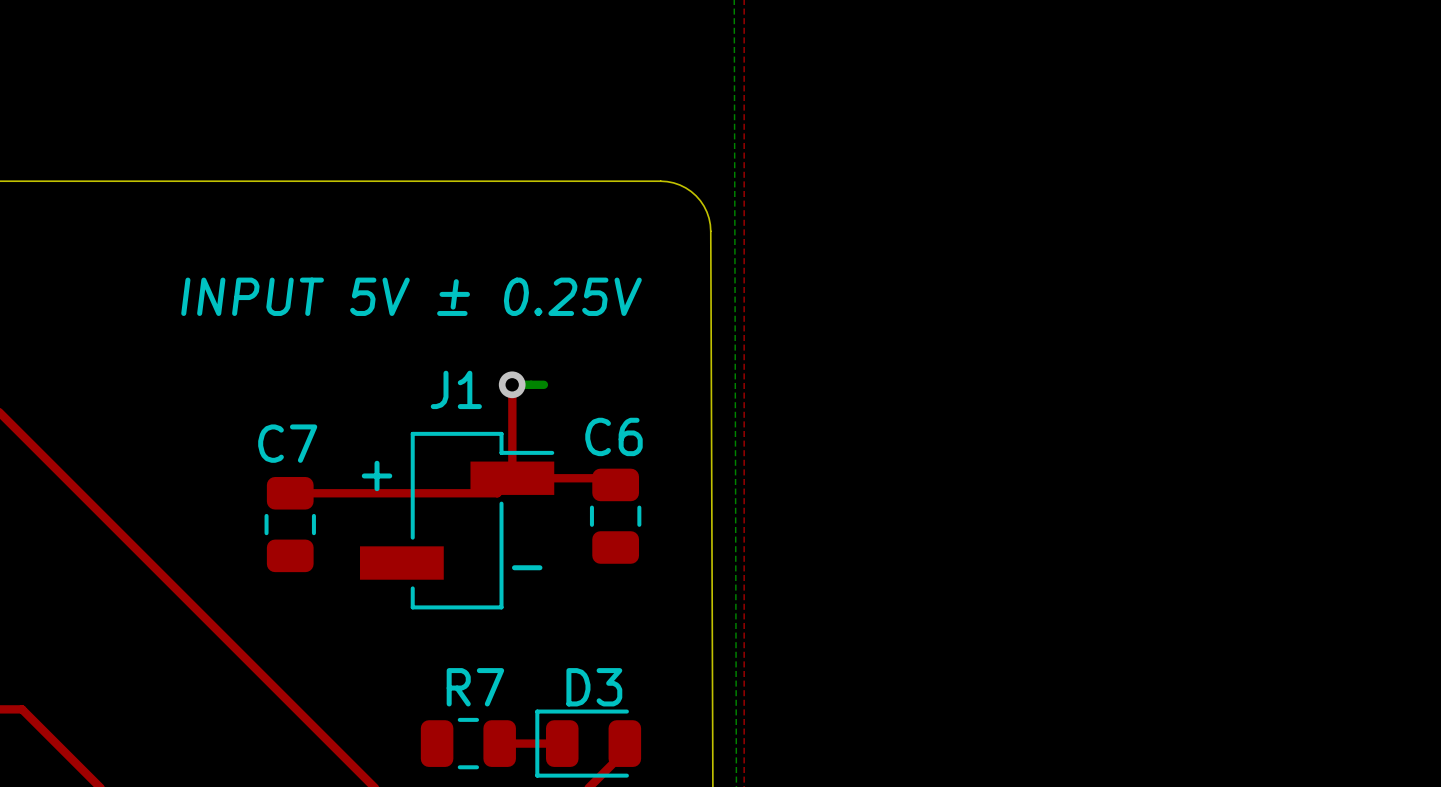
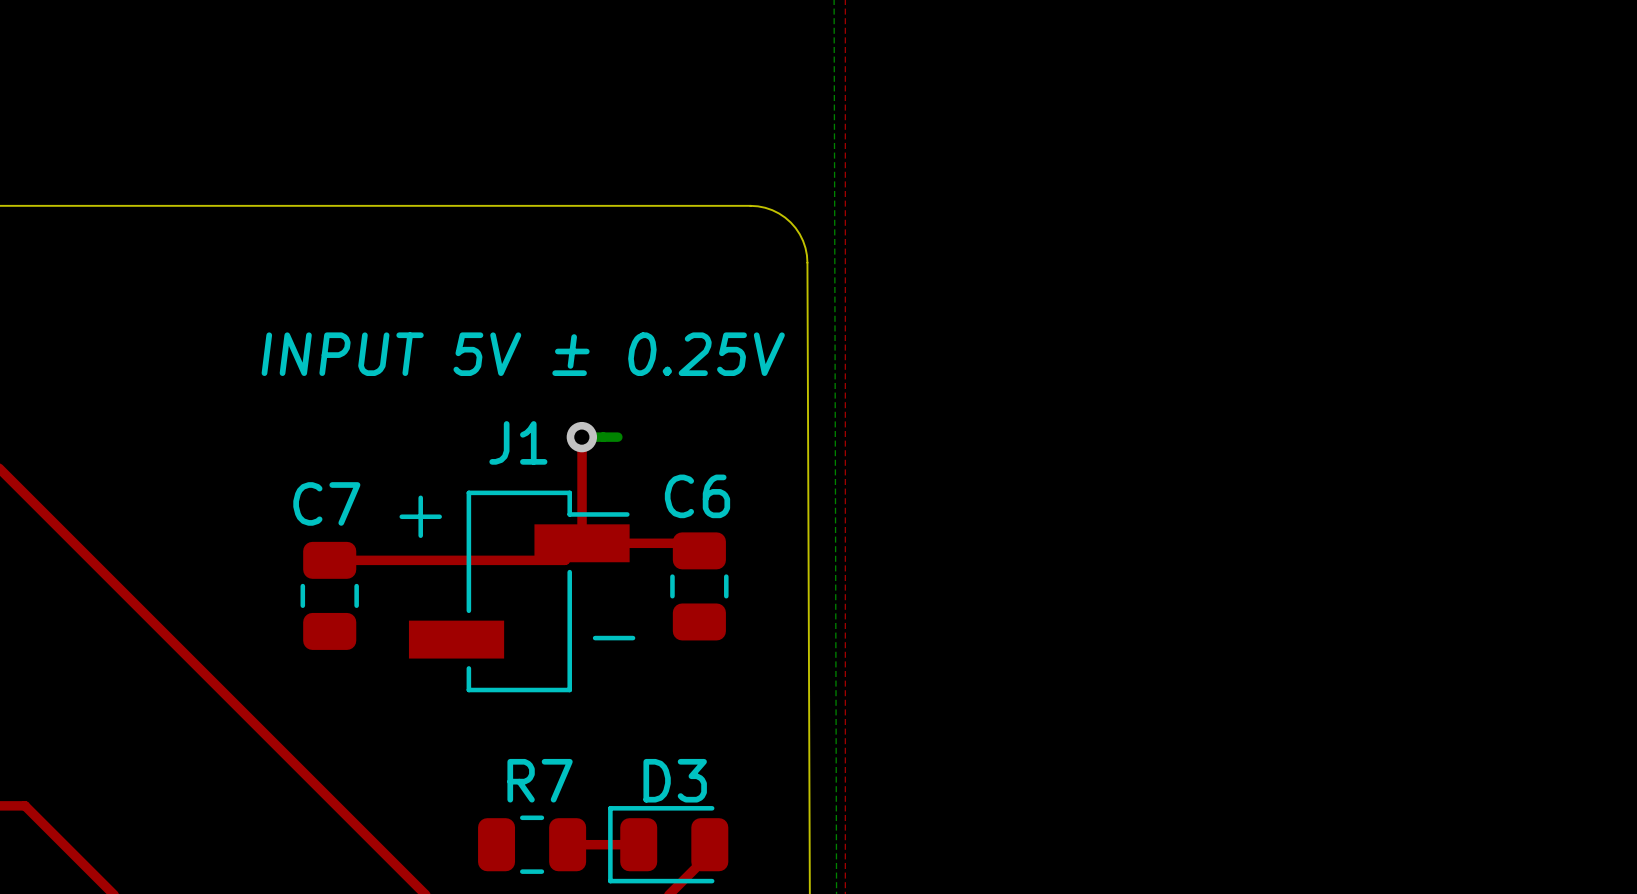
text position: INPUT 5V ± 0.25V (411, 296) -> INPUT 5V ± 0.25V (523, 354)
line: none -> (420, 497) (420, 535)
line: none -> (401, 516) (439, 516)
text: + (377, 475) -> none
line: none -> (595, 638) (633, 638)
text: - (527, 567) -> none

